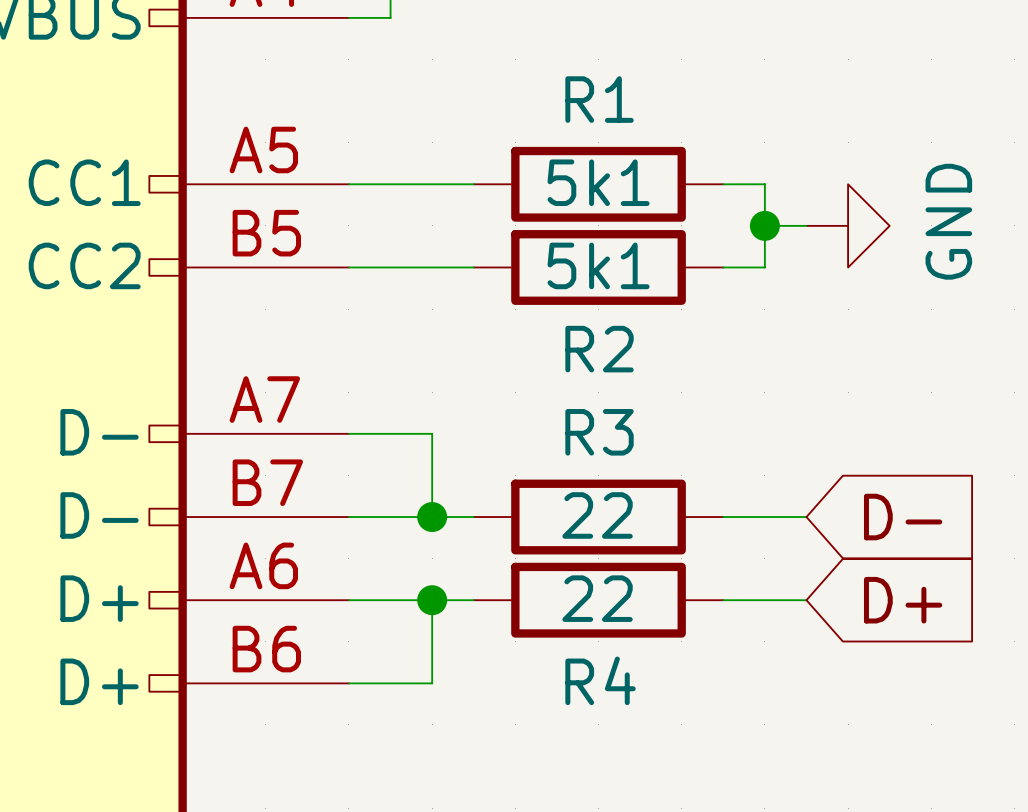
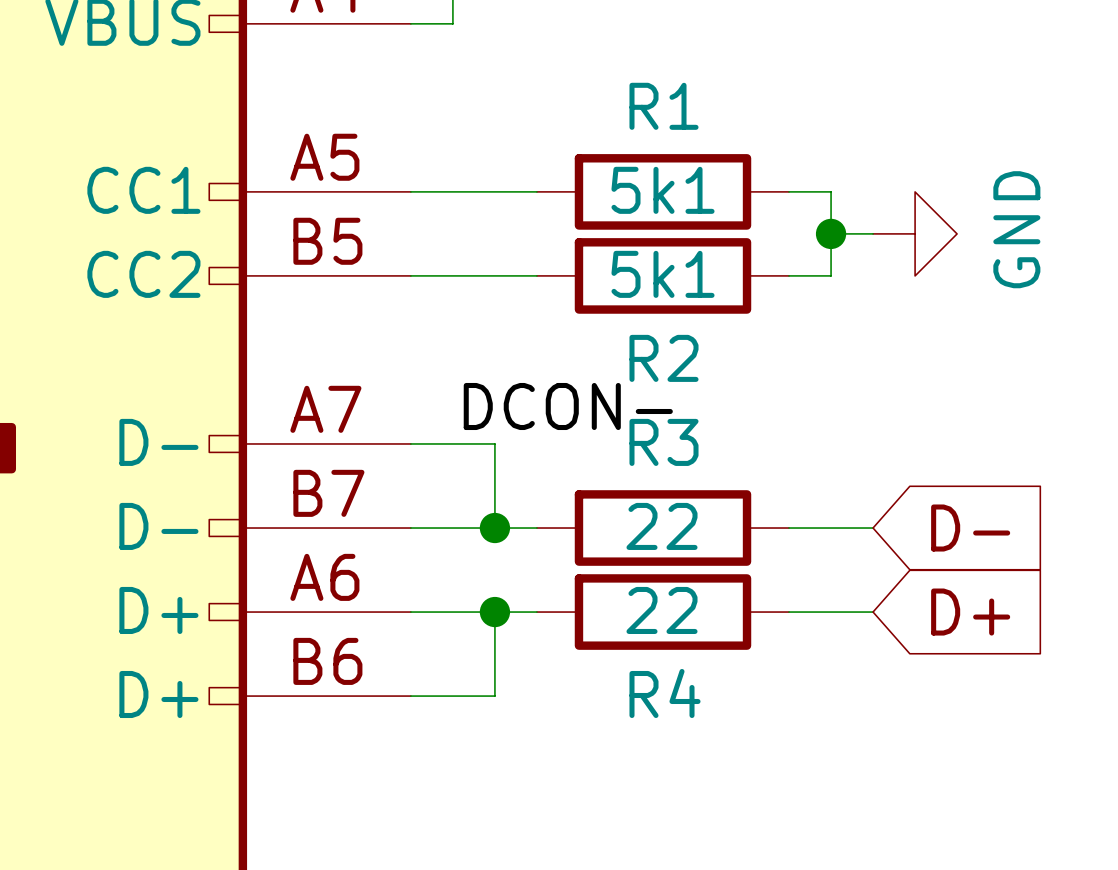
label: none -> DCON- (568, 406)

